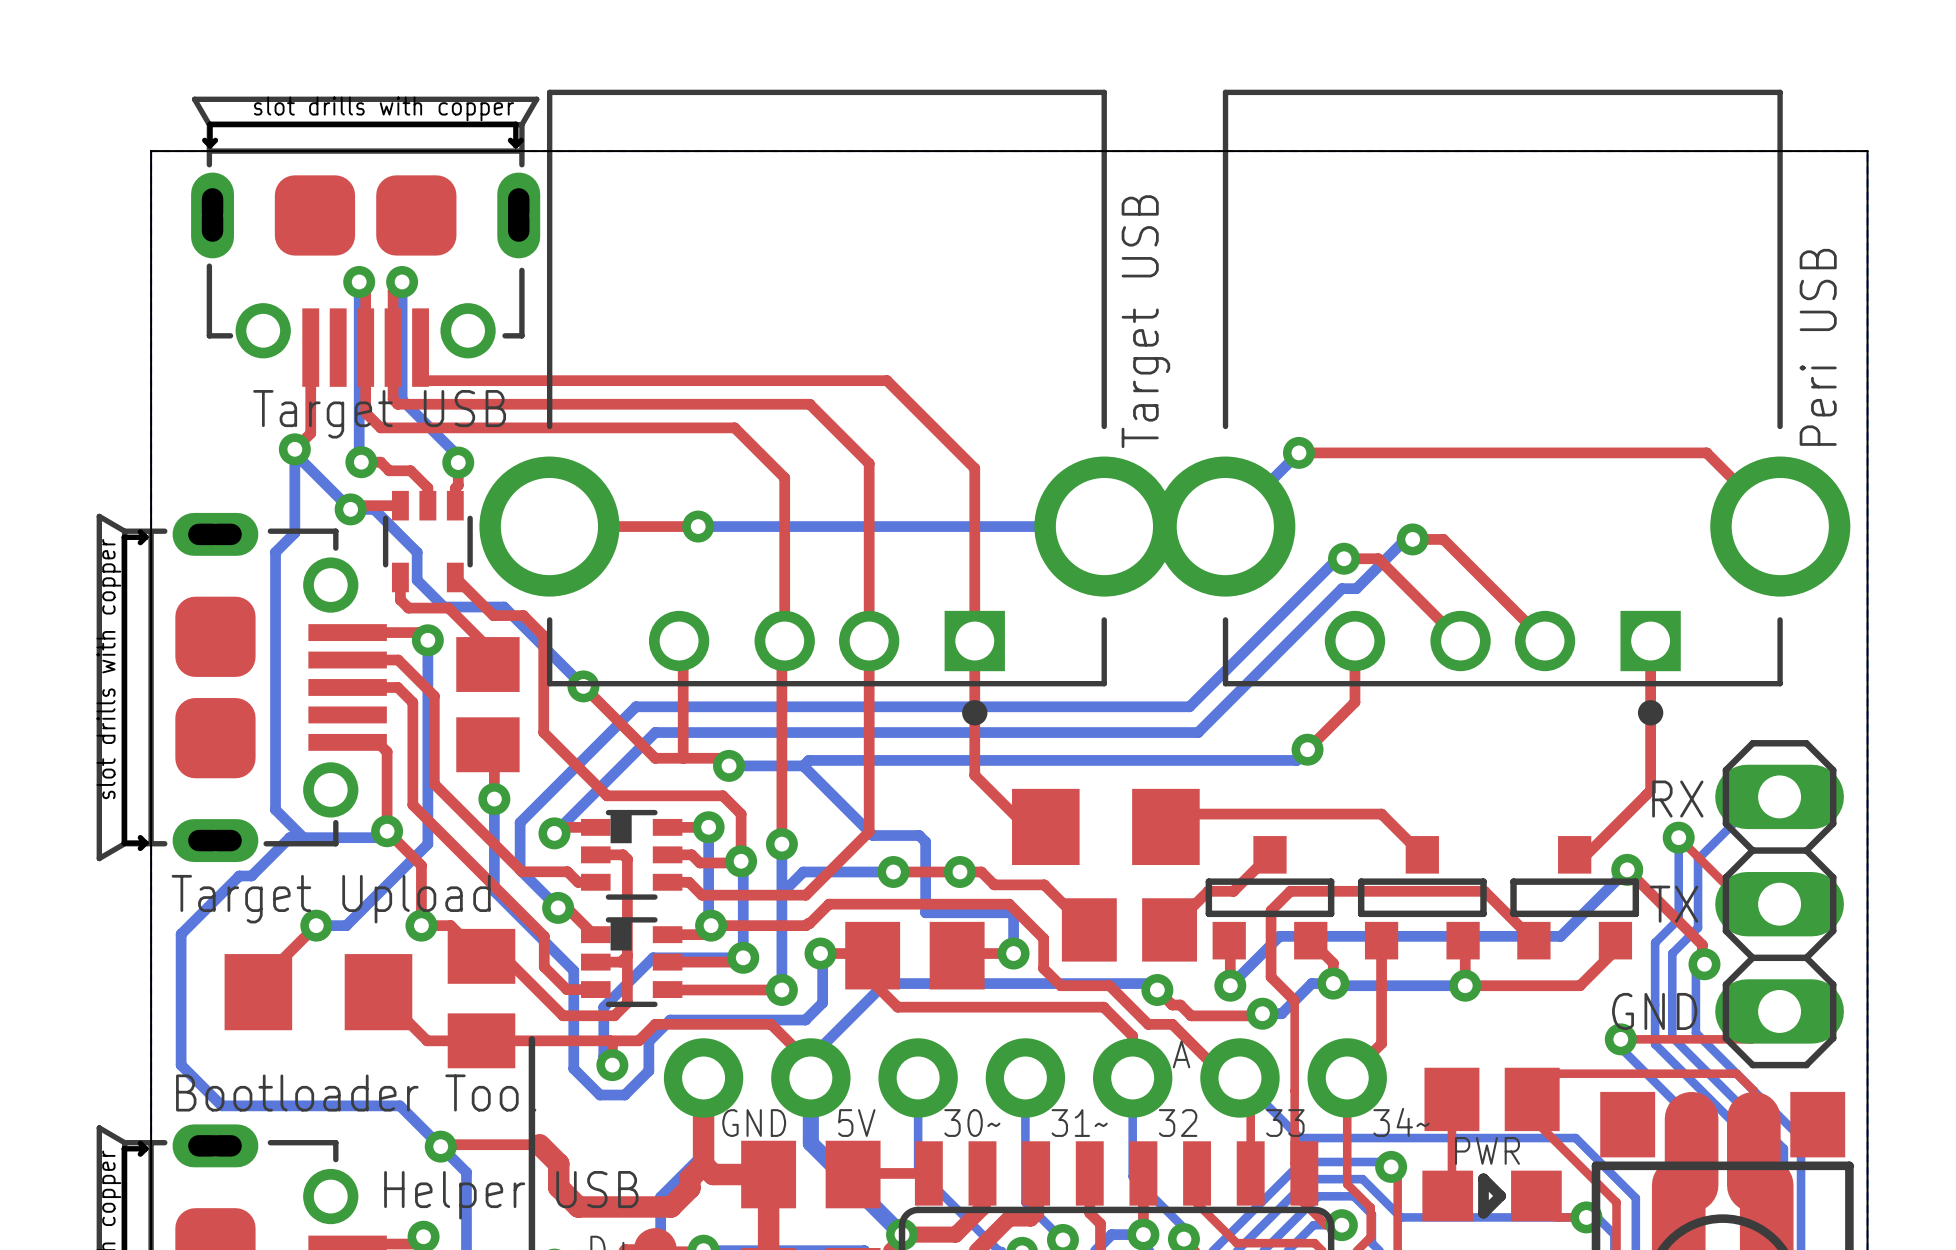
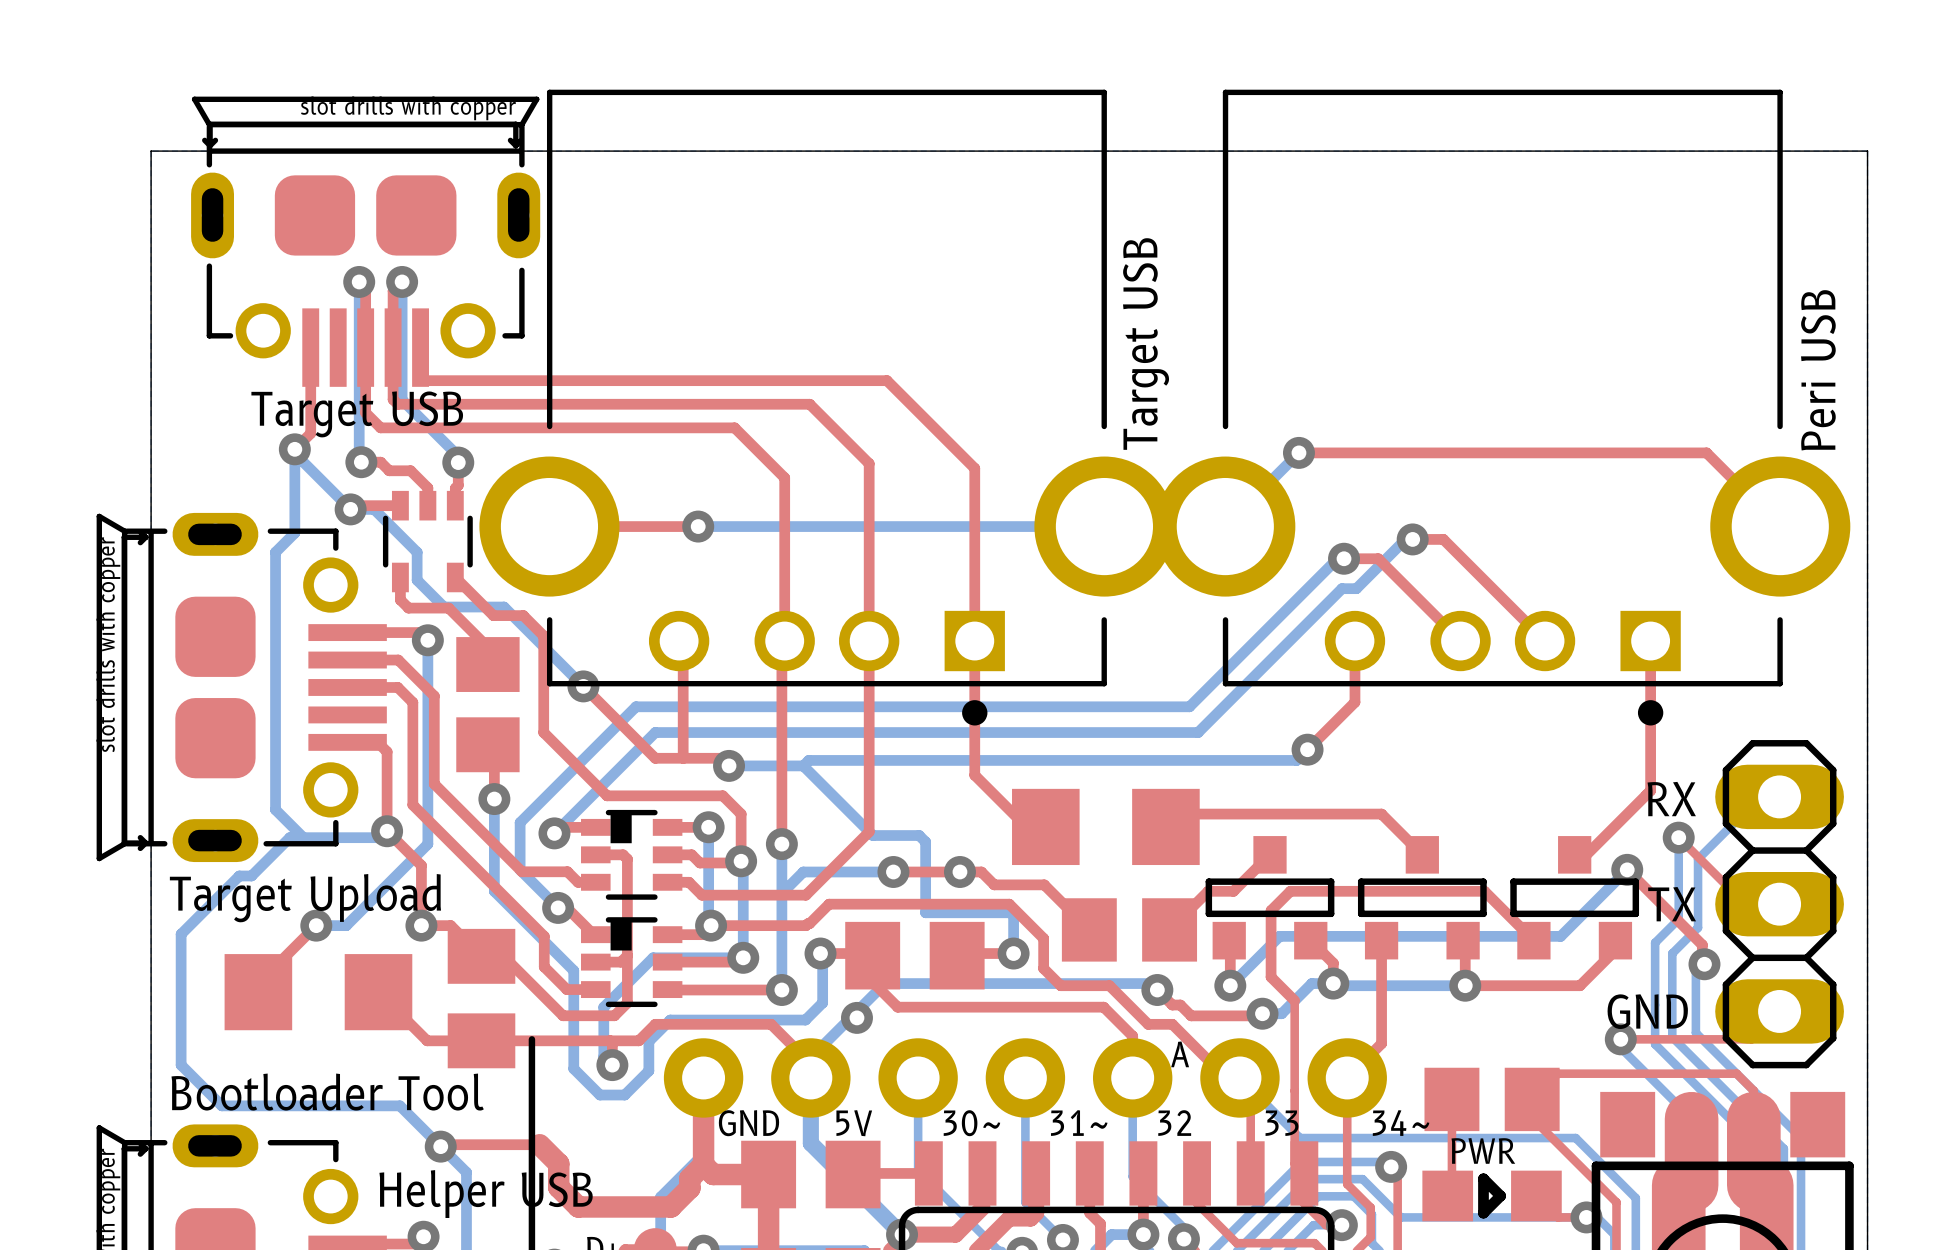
via: none -> (856, 1017)

